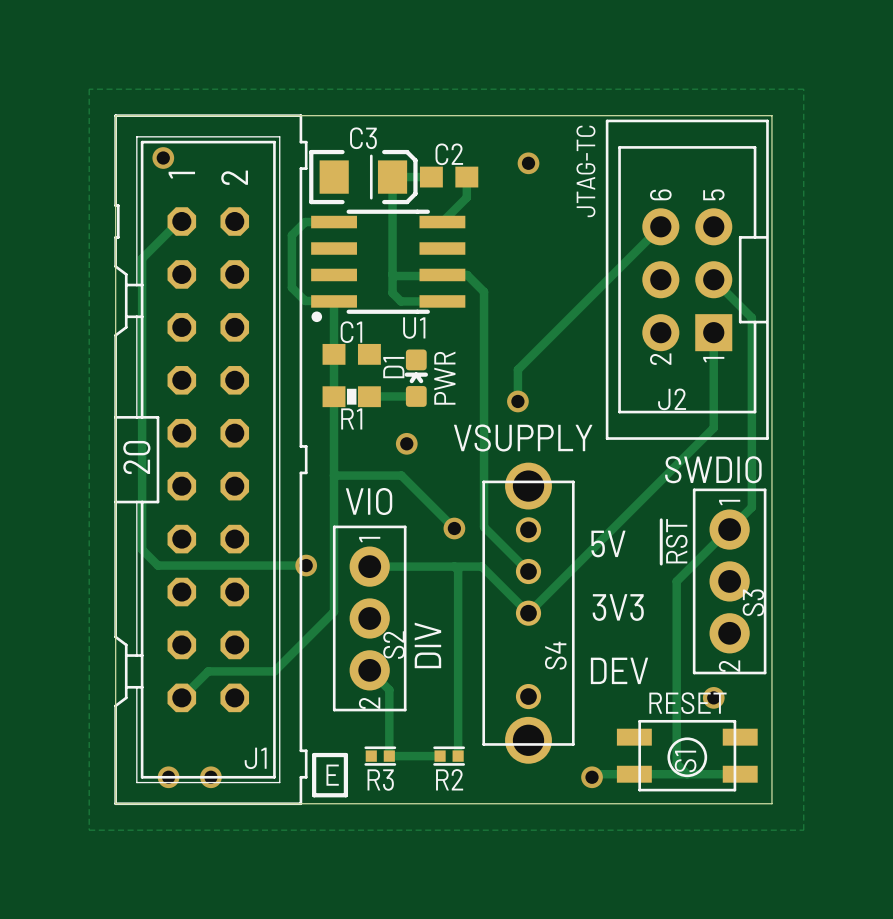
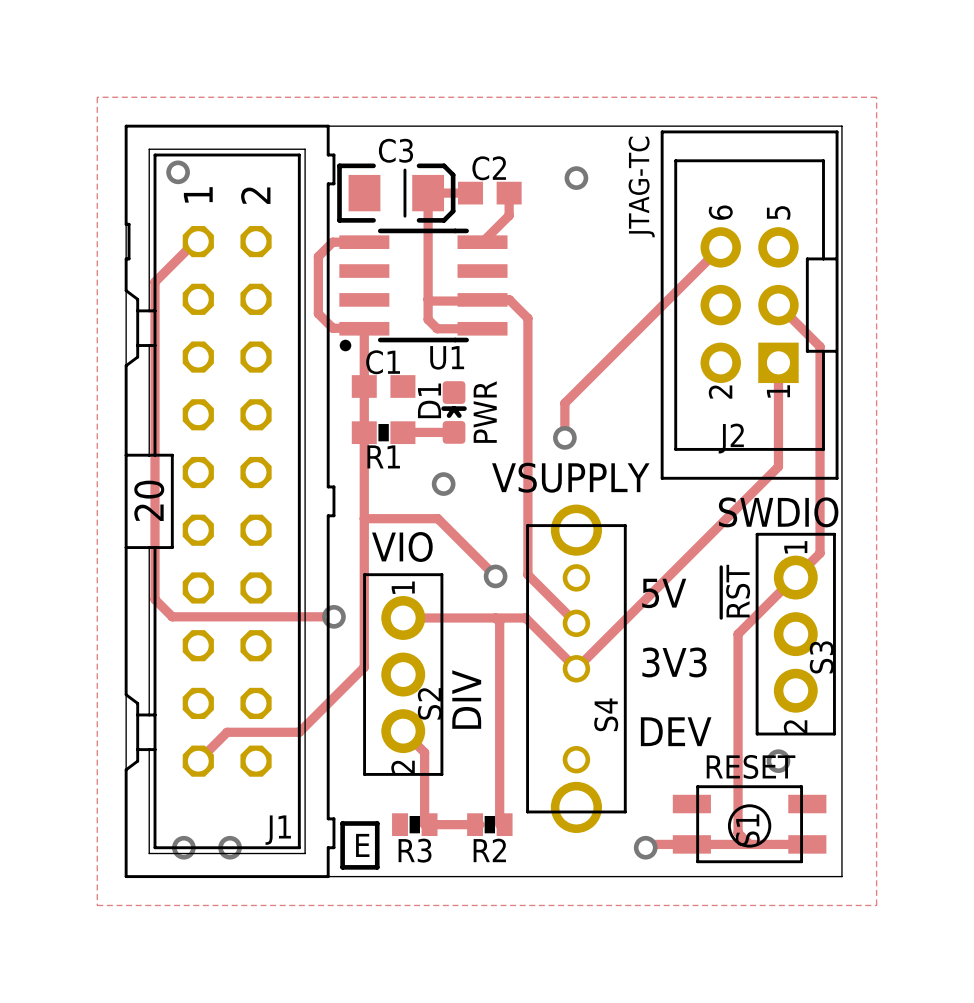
R3 footprint: [364, 746, 397, 766] -> [392, 813, 438, 837]
R2 footprint: [433, 746, 466, 766] -> [467, 813, 513, 837]

